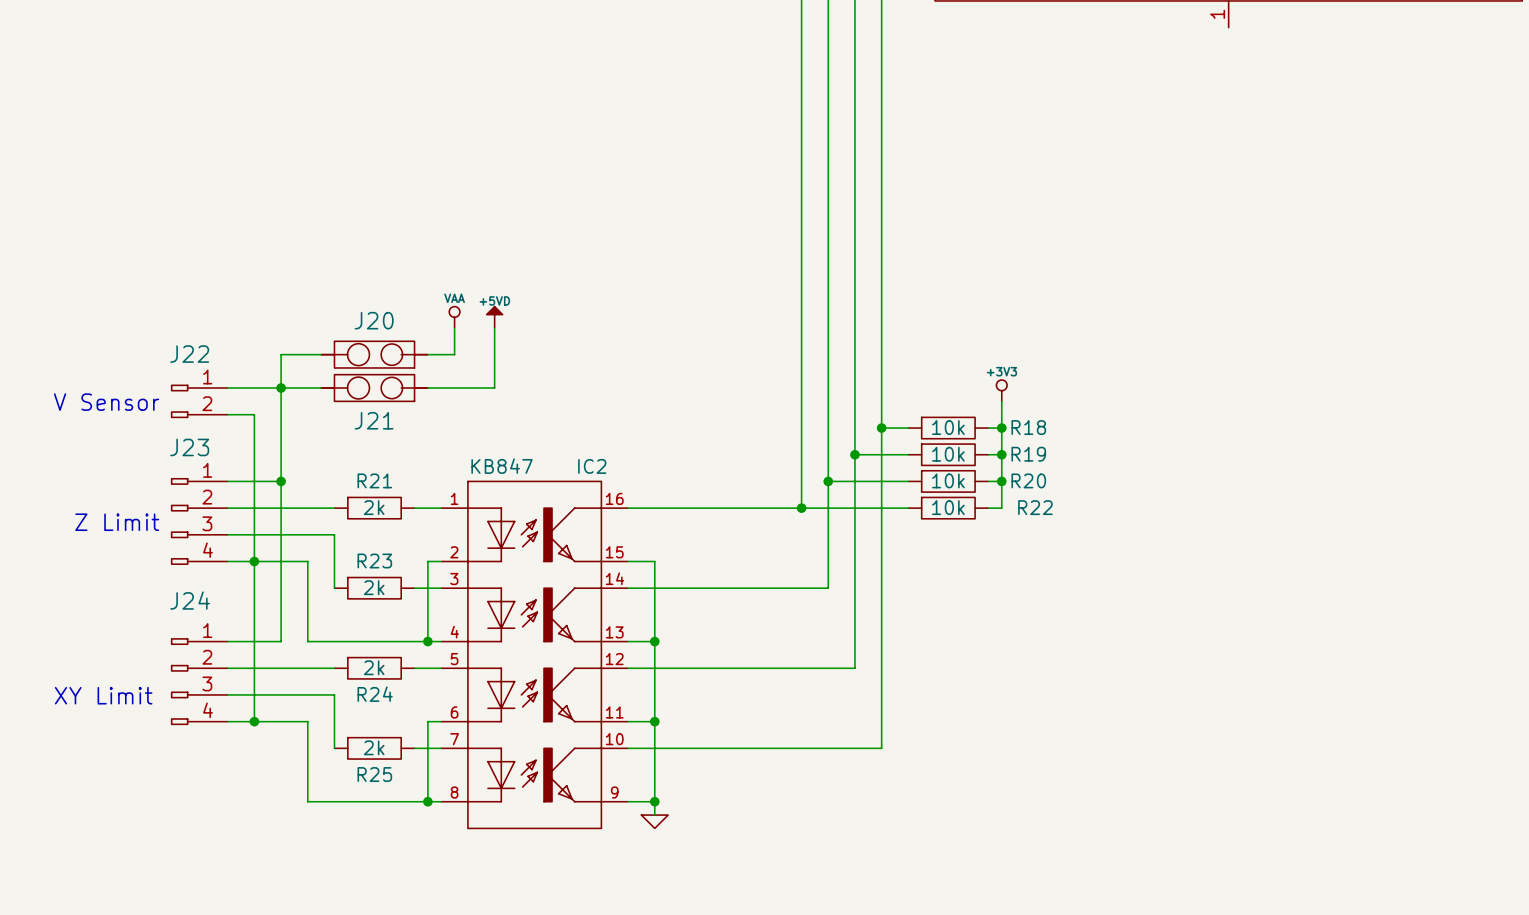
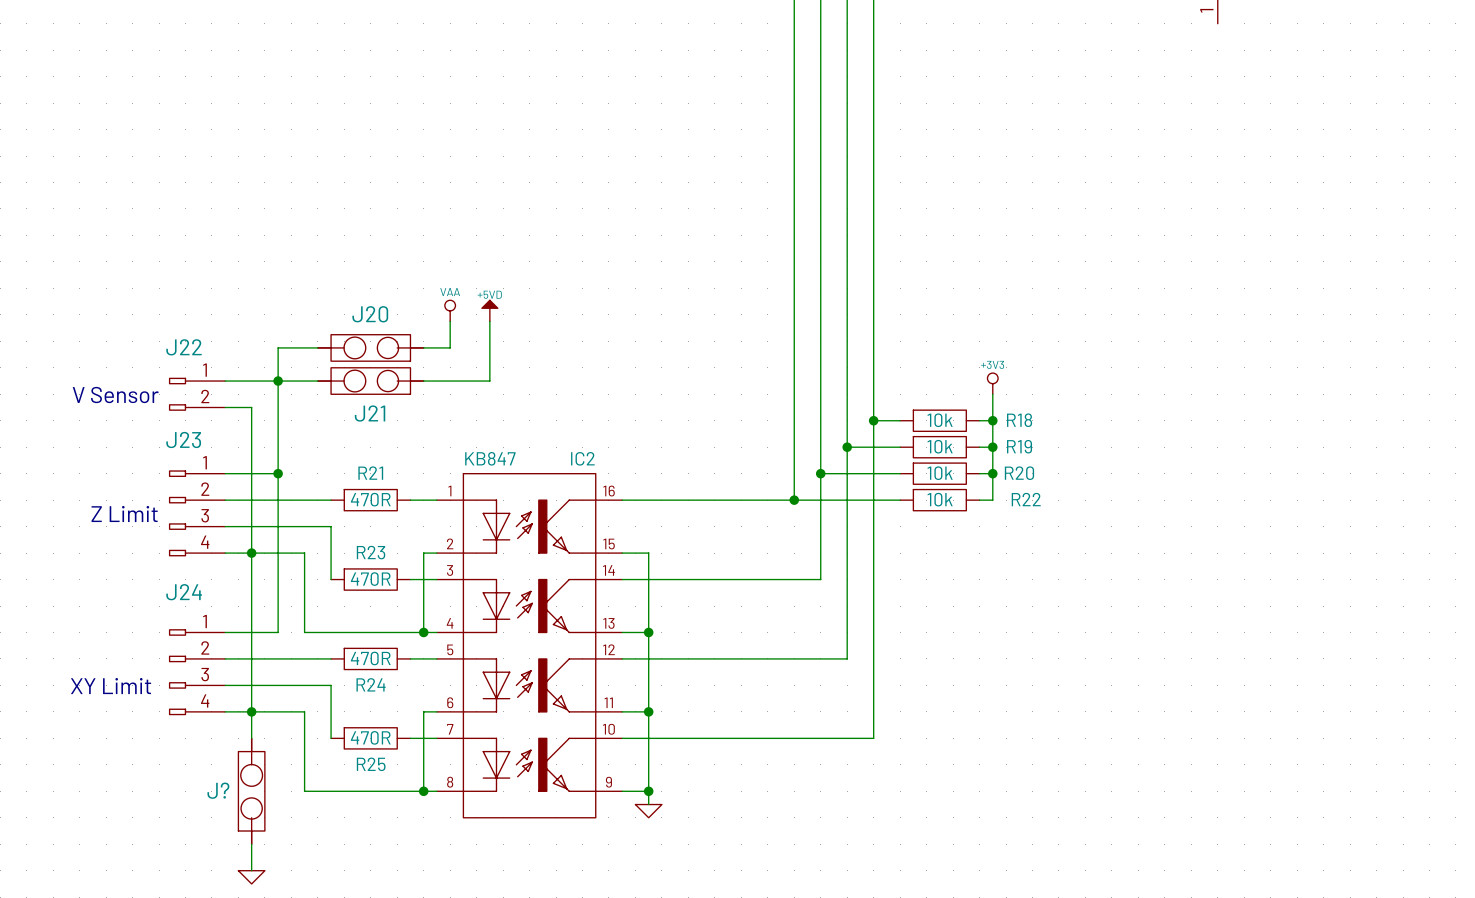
R21 value: 2k (374, 507) -> 470R (370, 499)
R23 value: 2k (374, 587) -> 470R (370, 579)
R24 value: 2k (374, 667) -> 470R (370, 658)
wire: none -> (251, 711) (251, 738)
R25 value: 2k (374, 747) -> 470R (370, 737)
J?: none -> (251, 791)
wire: none -> (251, 844) (251, 870)
power symbol: none -> (251, 877)

